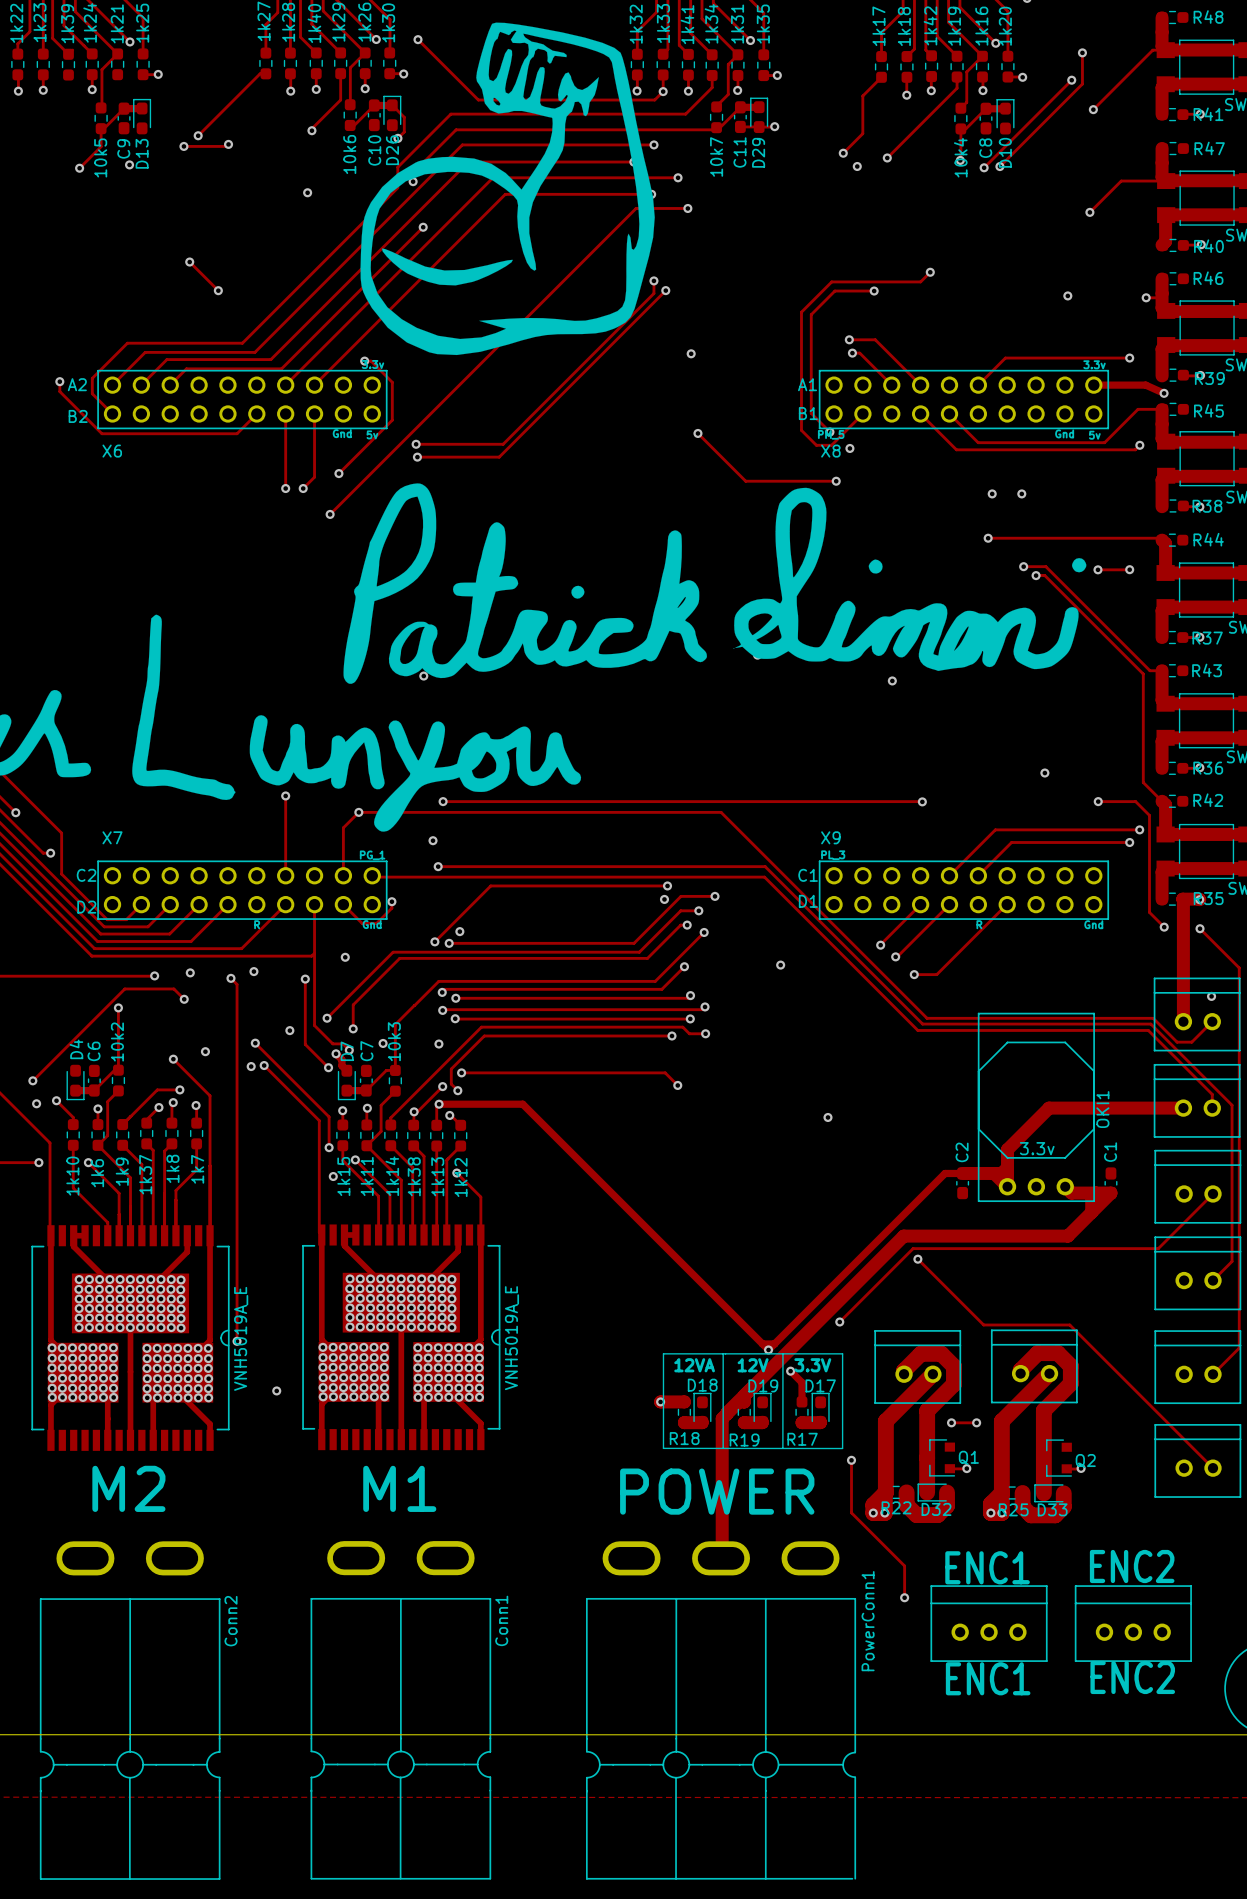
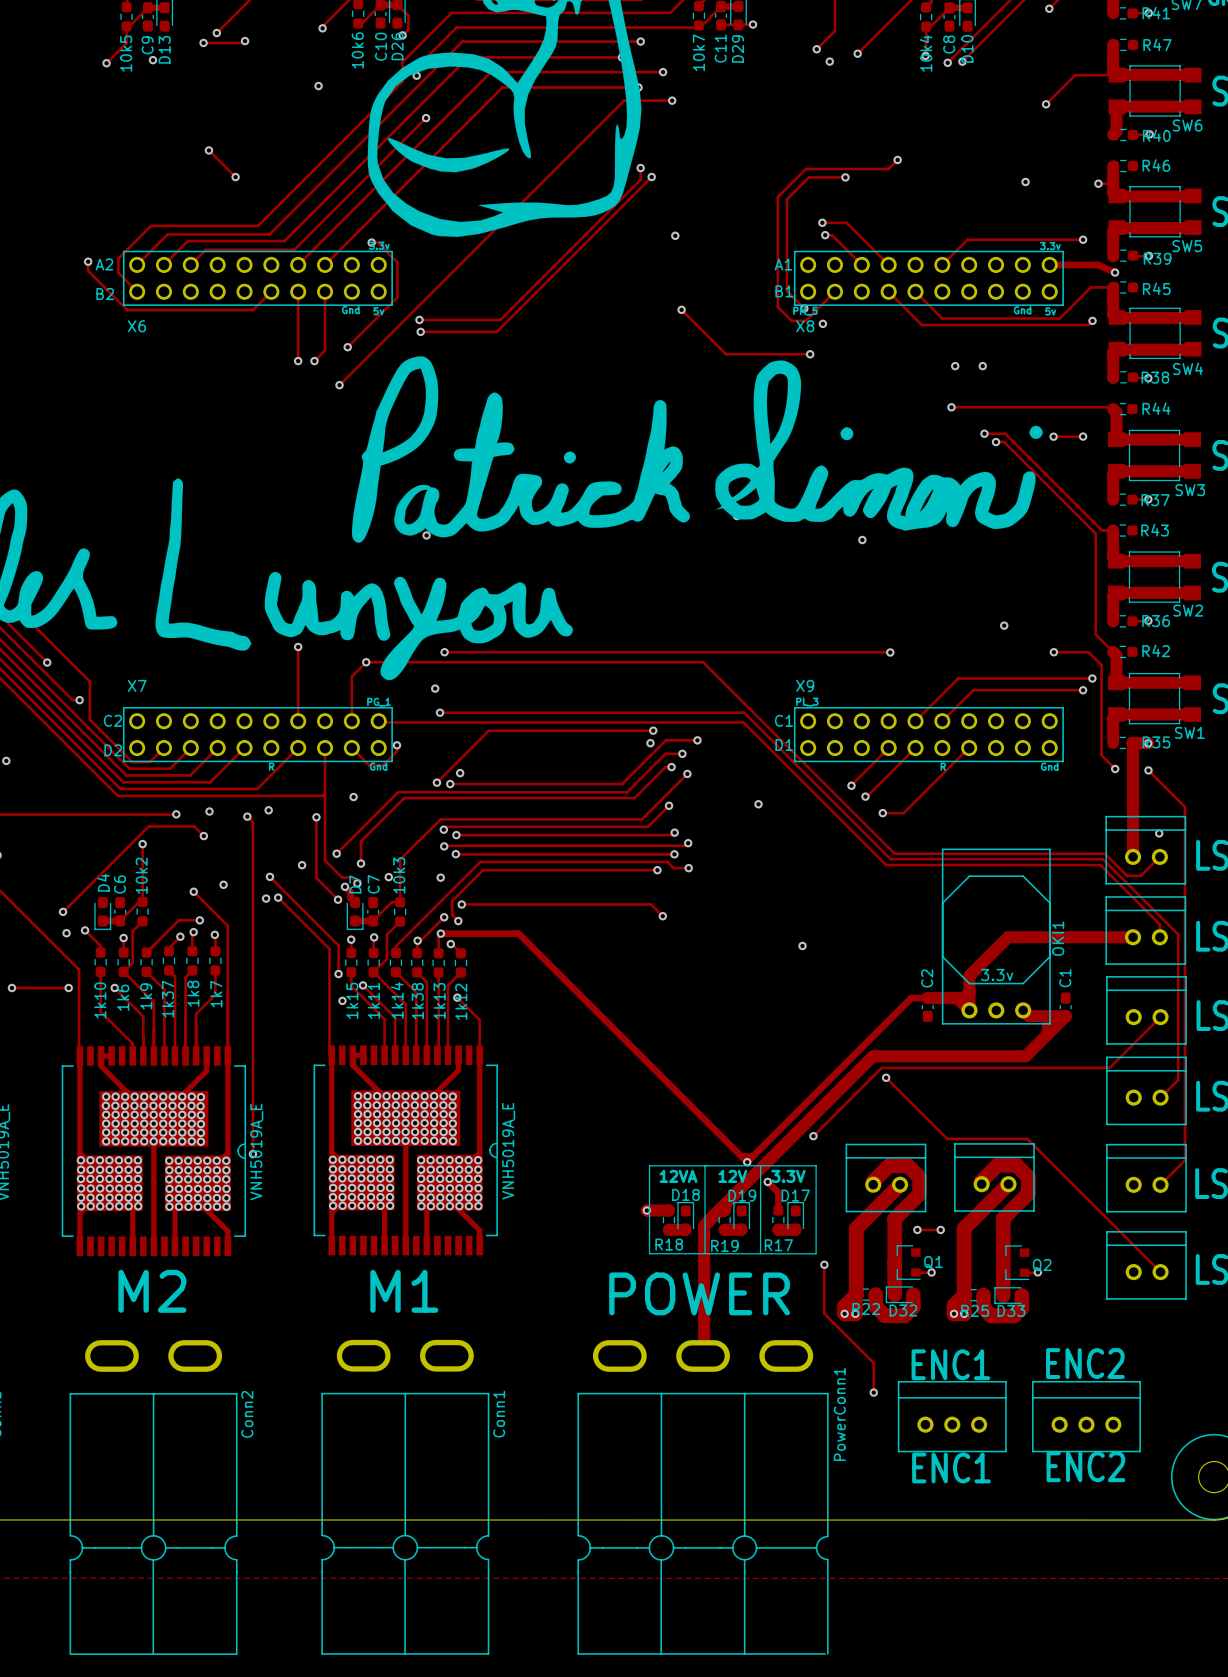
via: (276, 1390) -> none

